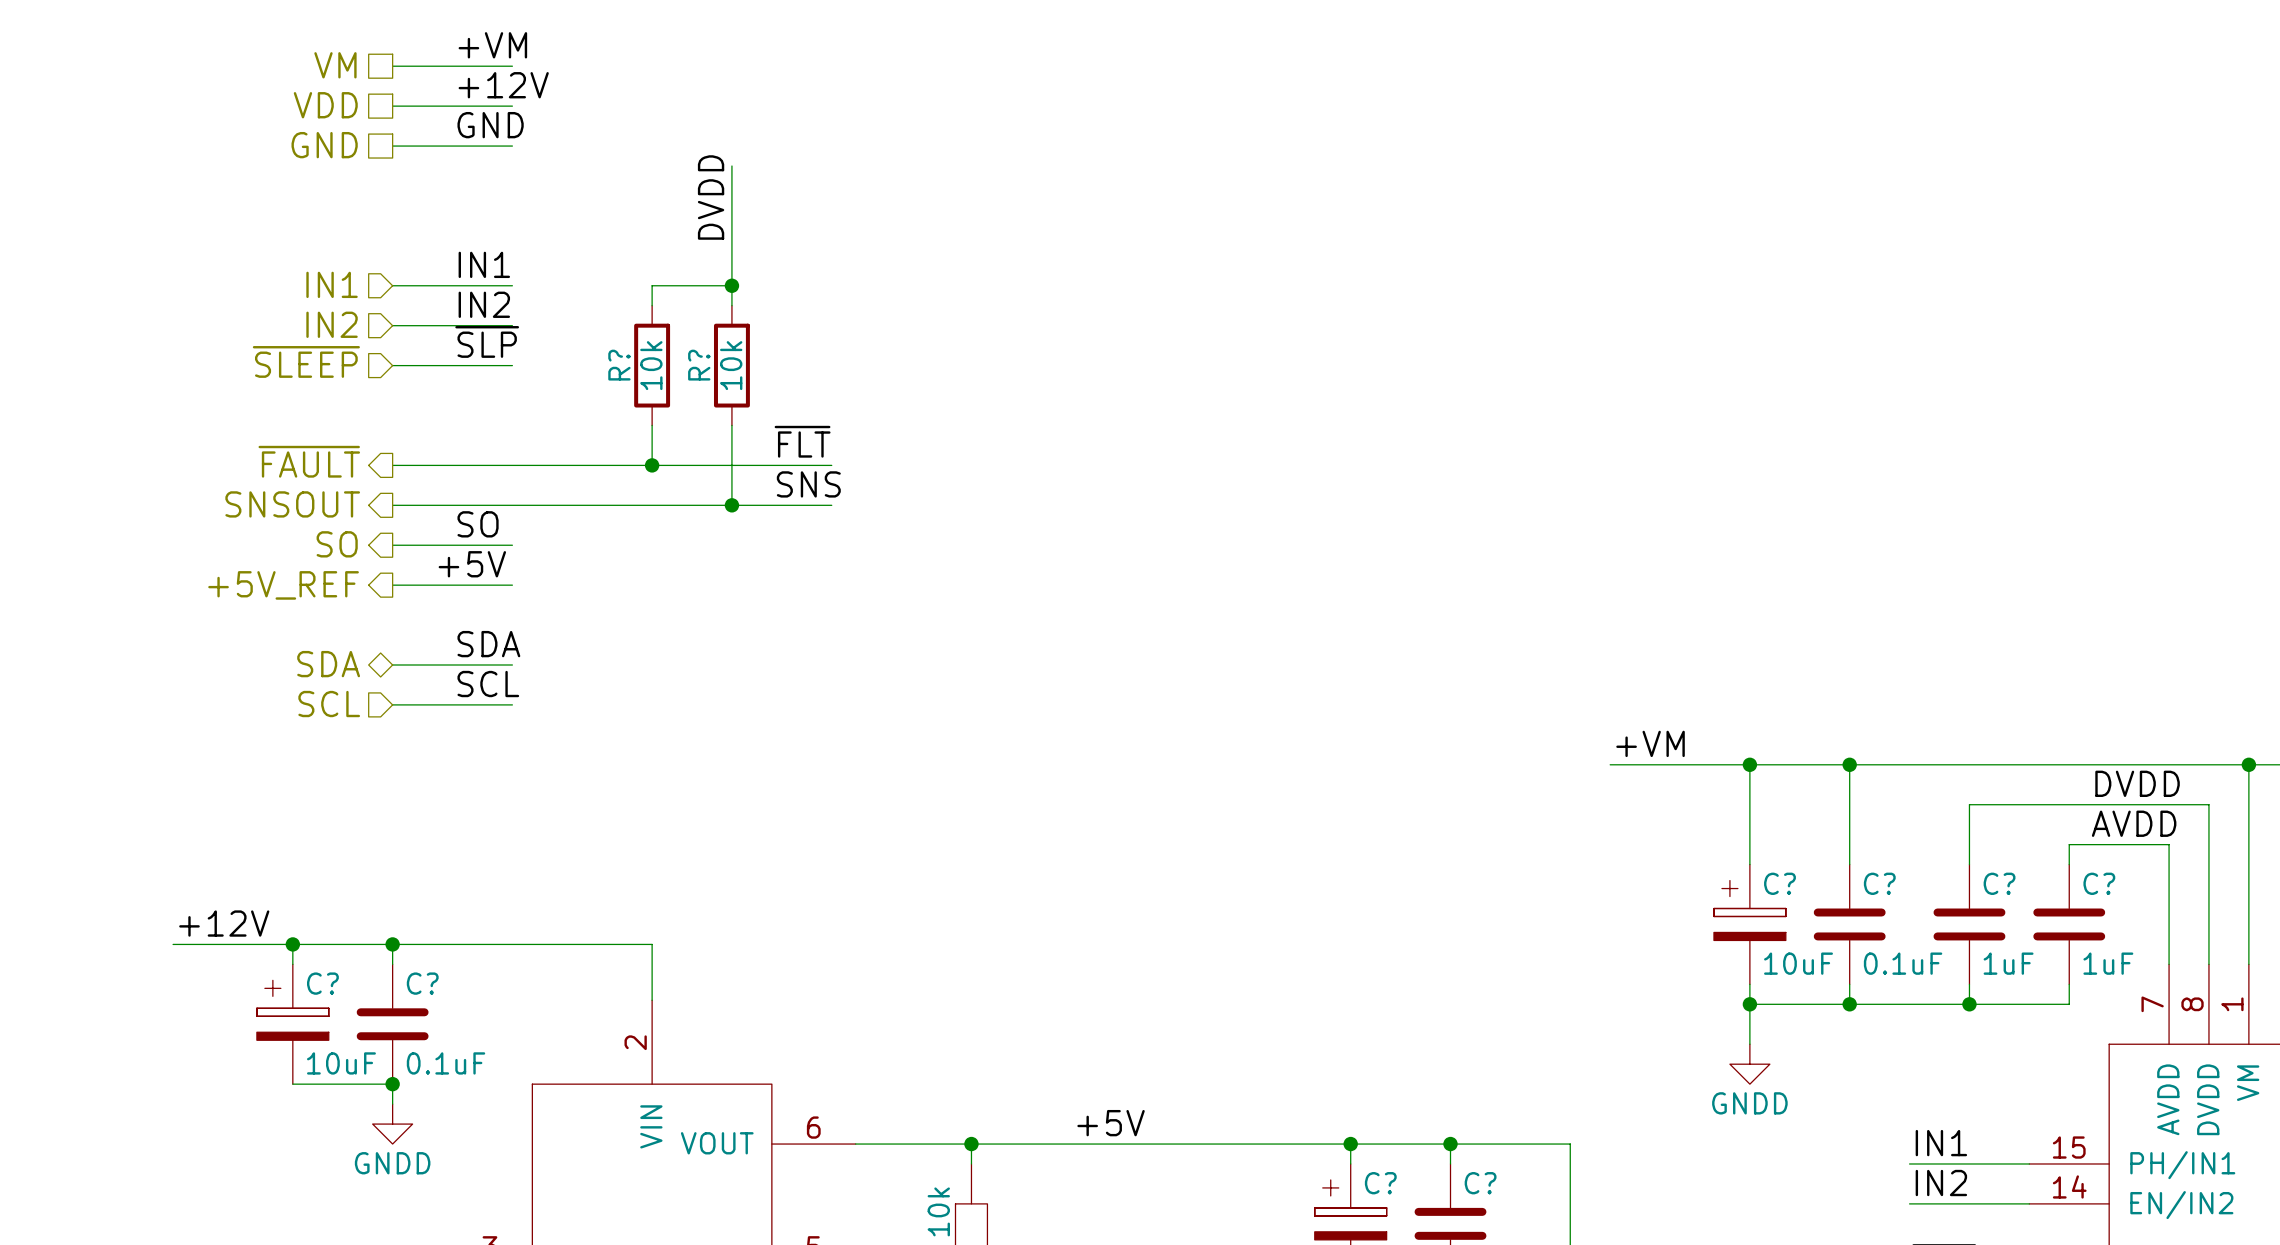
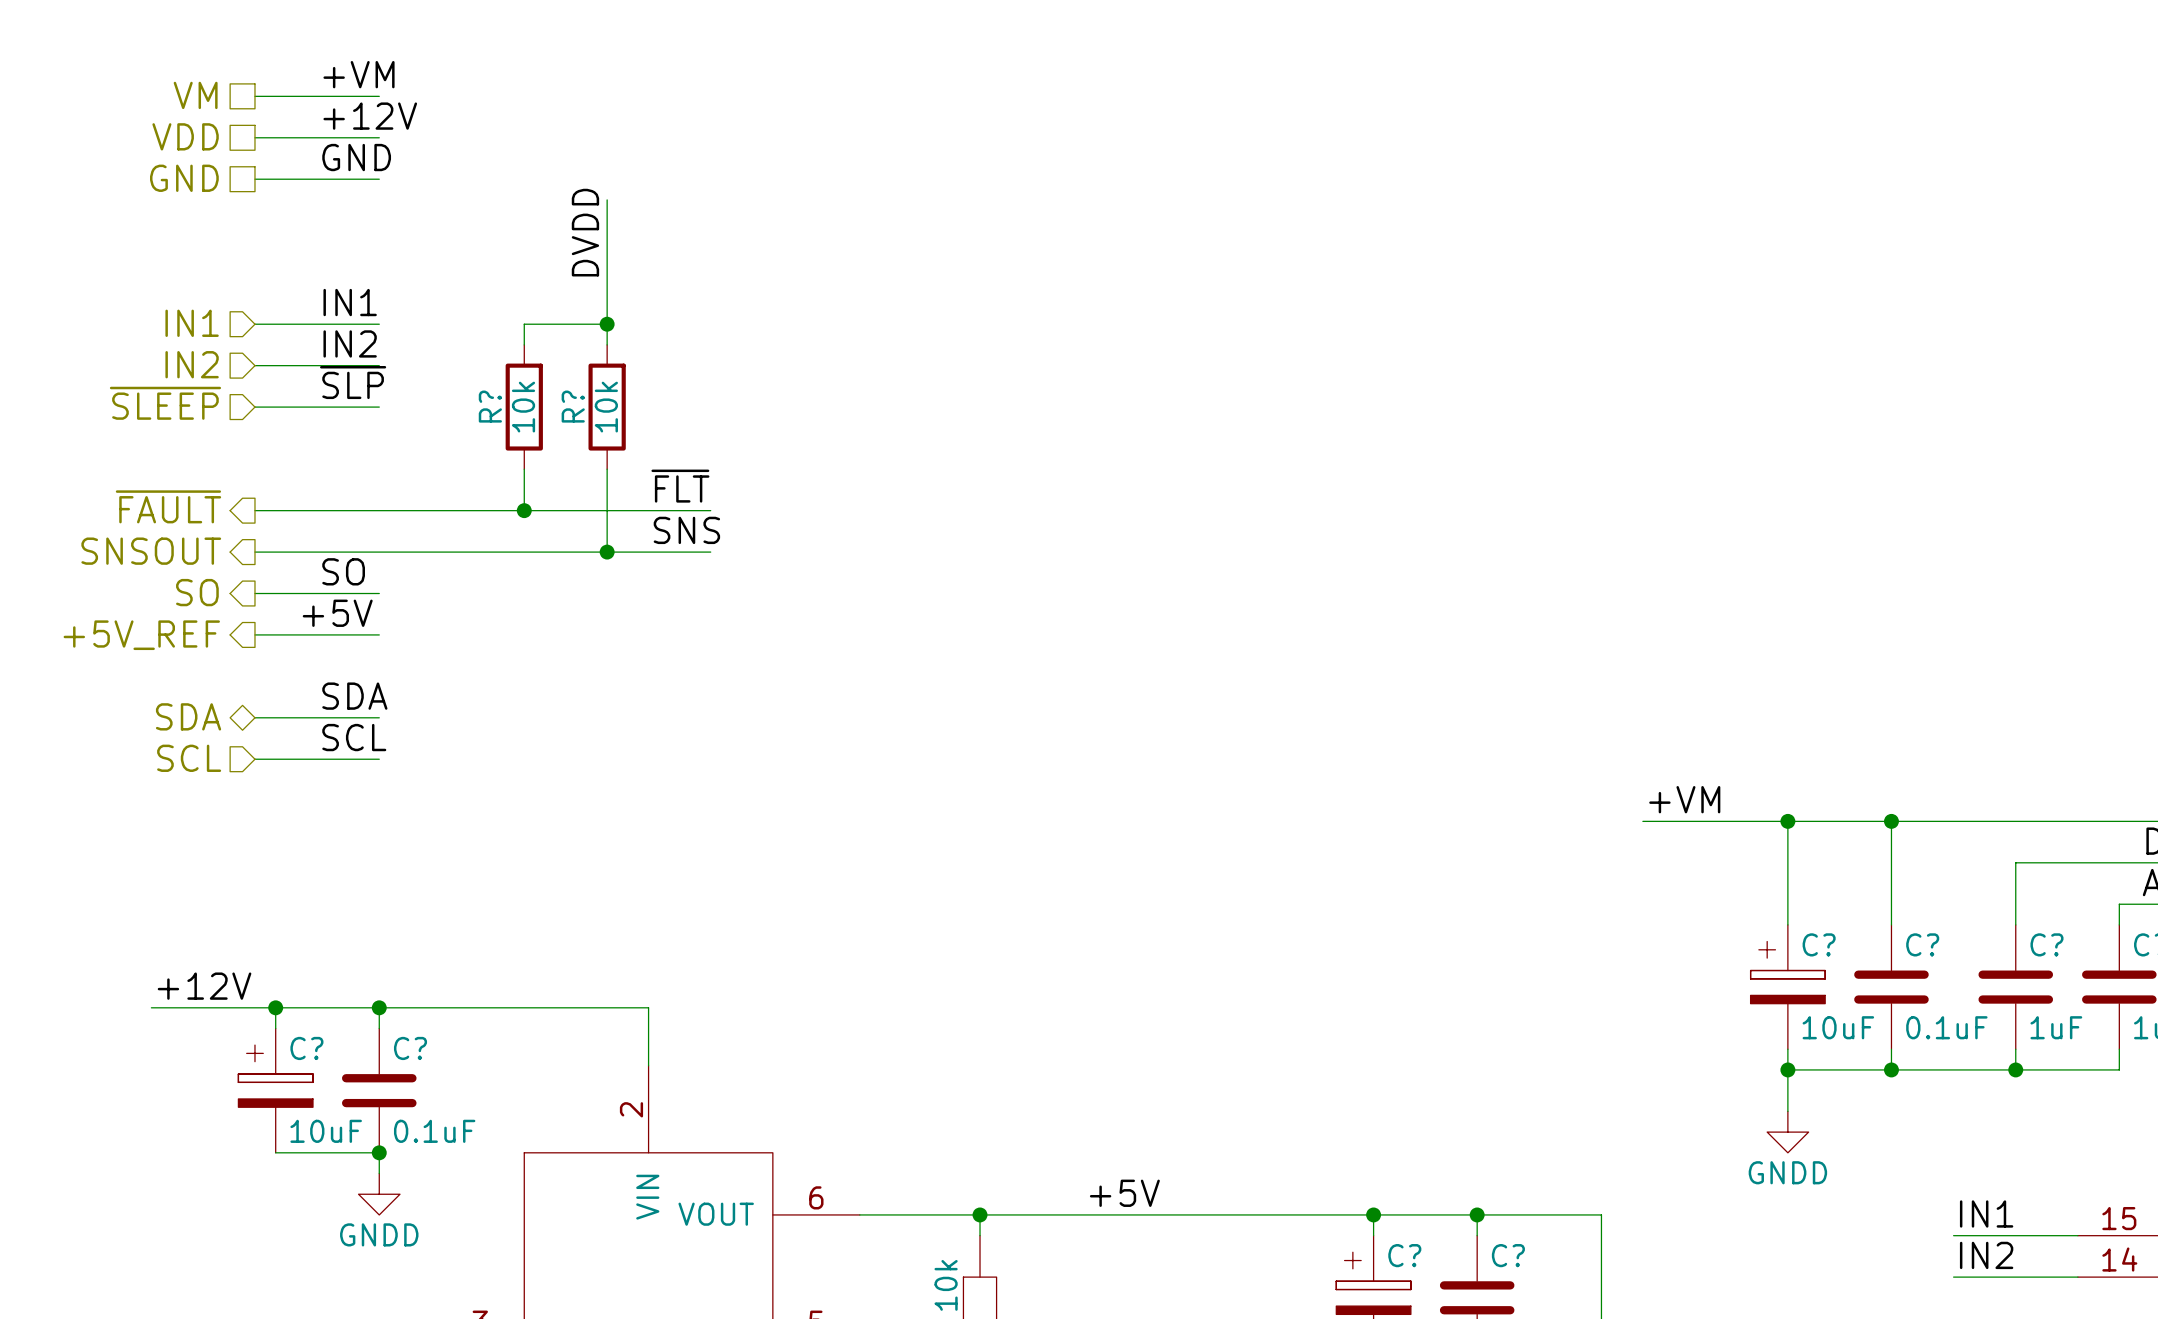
label position: +VM (492, 45) -> +VM (359, 74)
hierarchical label position: VM (335, 65) -> VM (195, 95)
wire: (392, 66) (512, 66) -> (379, 96) (254, 96)
label position: +12V (503, 85) -> +12V (370, 116)
hierarchical label position: VDD (325, 105) -> VDD (185, 136)
wire: (392, 106) (512, 106) -> (379, 137) (254, 137)
label position: GND (490, 125) -> GND (356, 157)
hierarchical label position: GND (324, 145) -> GND (184, 178)
wire: (392, 146) (512, 146) -> (379, 179) (254, 179)
wire: (731, 166) (731, 305) -> (607, 199) (607, 344)
label position: DVDD (711, 197) -> DVDD (585, 232)
label position: IN1 (484, 264) -> IN1 (350, 302)
hierarchical label position: IN1 (332, 284) -> IN1 (192, 323)
wire: (392, 285) (512, 285) -> (379, 324) (254, 324)
junction: none -> (607, 324)
wire: (731, 285) (652, 285) (652, 305) -> (607, 324) (524, 324) (524, 344)
junction: (731, 285) -> none
label position: IN2 (484, 304) -> IN2 (350, 343)
hierarchical label position: IN2 (332, 324) -> IN2 (192, 364)
wire: (392, 325) (512, 325) -> (379, 365) (254, 365)
label position: ~{SLP} (487, 341) -> ~{SLP} (353, 382)
hierarchical label position: ~{SLEEP} (306, 361) -> ~{SLEEP} (165, 403)
wire: (392, 365) (512, 365) -> (379, 407) (254, 407)
R?: none -> 10k (524, 407)
R? position: (652, 365) -> (607, 407)
R?: 10k (731, 365) -> none
wire: (652, 425) (652, 465) -> (524, 469) (524, 510)
wire: (731, 425) (731, 505) -> (607, 469) (607, 552)
label position: ~{FLT} (802, 441) -> ~{FLT} (680, 486)
hierarchical label position: ~{FAULT} (309, 461) -> ~{FAULT} (168, 506)
wire: none -> (254, 510) (379, 510)
junction: none -> (524, 510)
junction position: (652, 465) -> (607, 552)
wire: (711, 465) (831, 465) -> none
label position: SNS (808, 484) -> SNS (686, 530)
hierarchical label position: SNSOUT (292, 504) -> SNSOUT (151, 551)
wire: none -> (254, 552) (379, 552)
wire: (711, 505) (831, 505) -> none
junction: (731, 505) -> none
label position: SO (478, 524) -> SO (343, 571)
hierarchical label position: SO (337, 544) -> SO (197, 592)
wire: (392, 545) (512, 545) -> (379, 593) (254, 593)
label position: +5V (472, 564) -> +5V (337, 613)
hierarchical label position: +5V_REF (283, 585) -> +5V_REF (141, 635)
wire: (392, 585) (512, 585) -> (379, 634) (254, 634)
label position: SDA (488, 644) -> SDA (354, 696)
hierarchical label position: SDA (328, 664) -> SDA (188, 716)
wire: (392, 664) (512, 664) -> (379, 717) (254, 717)
label position: SCL (488, 684) -> SCL (354, 737)
hierarchical label position: SCL (329, 704) -> SCL (189, 758)
wire: (392, 704) (512, 704) -> (379, 759) (254, 759)

